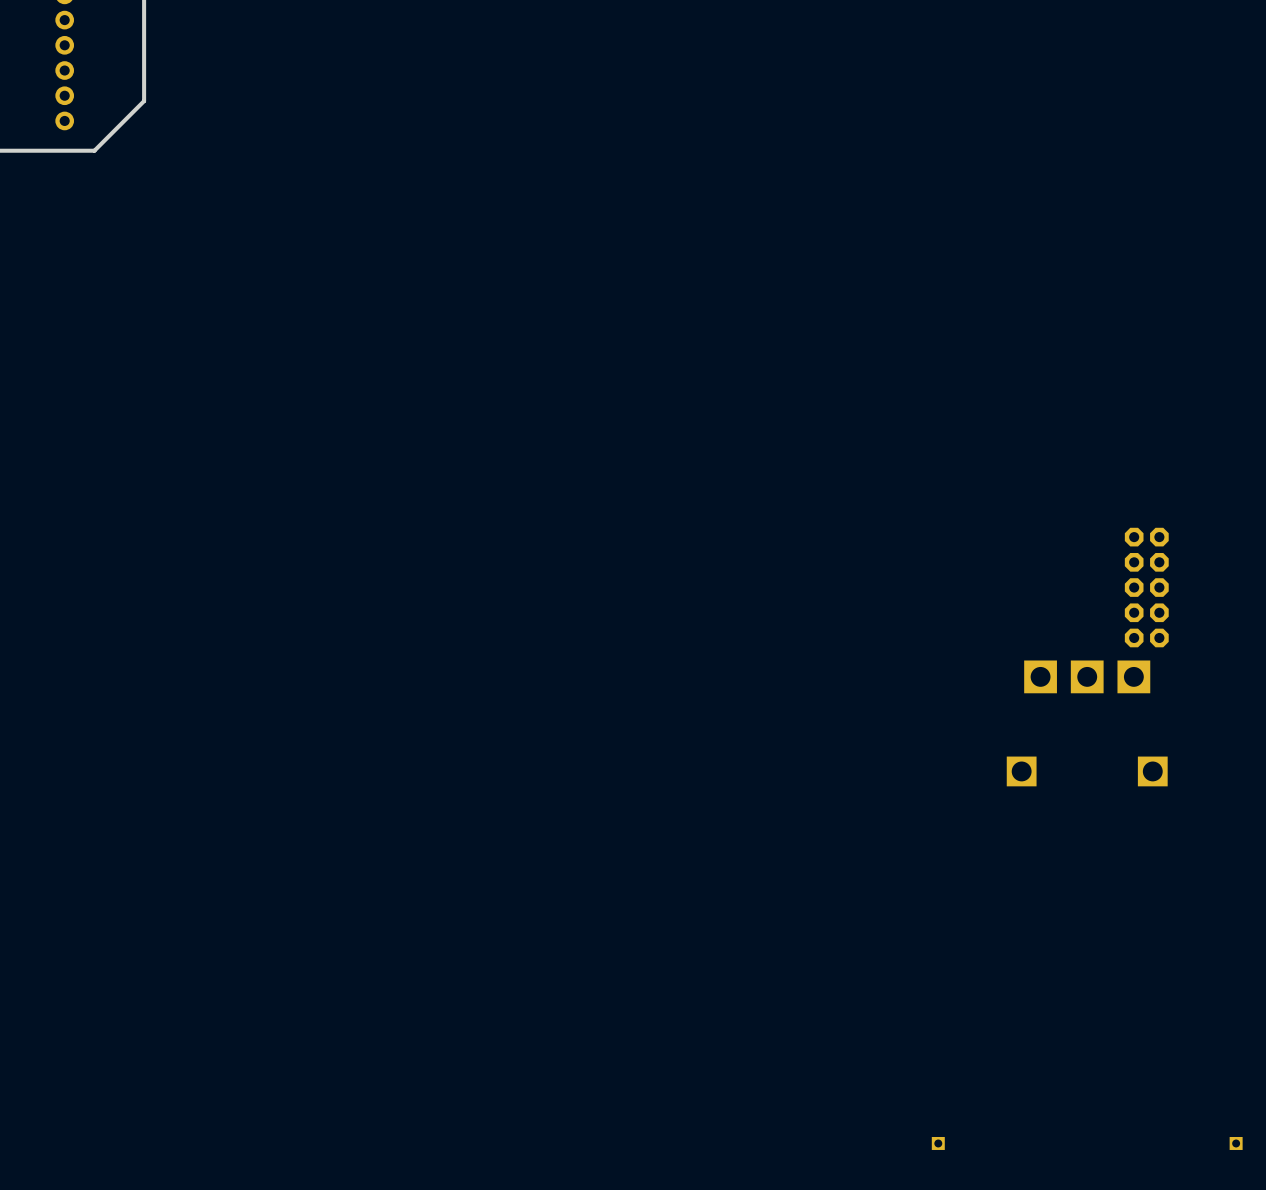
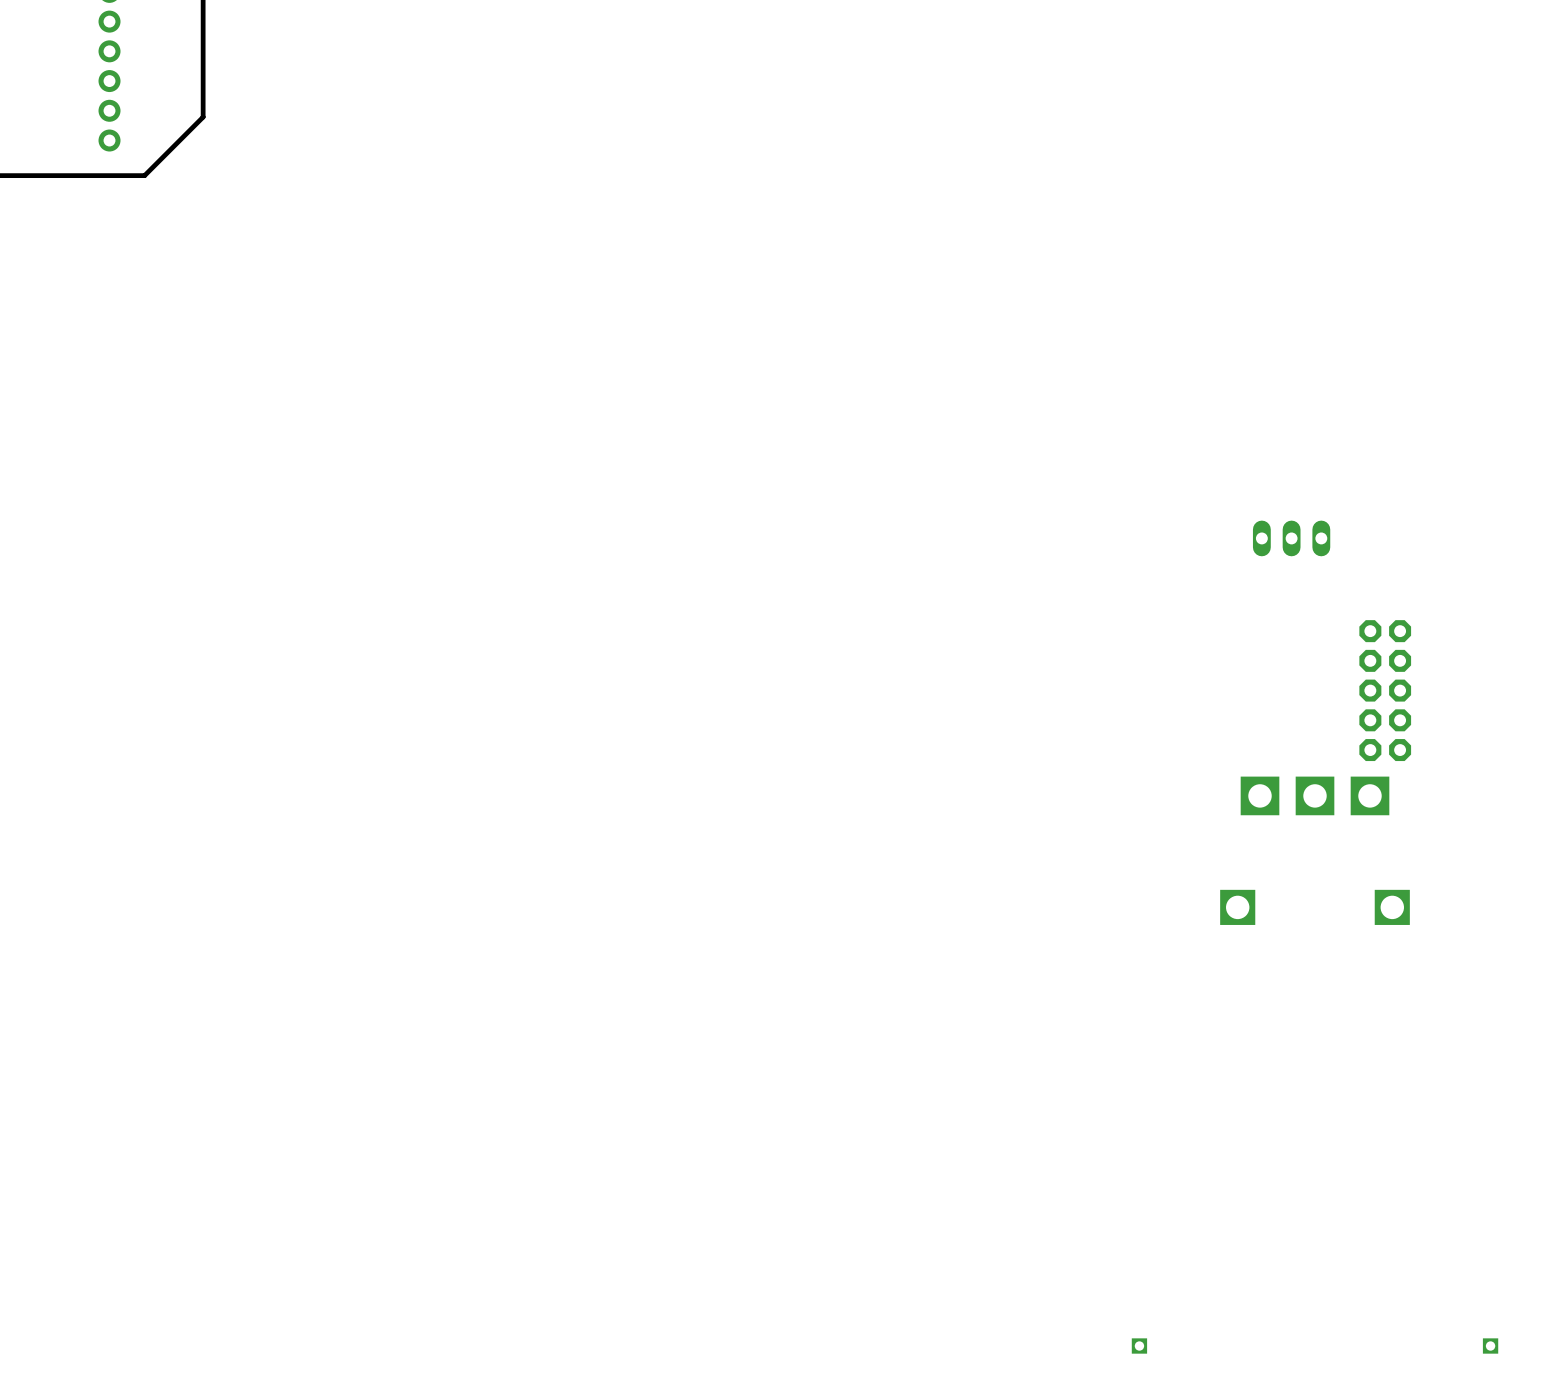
part: none -> (1291, 538)

